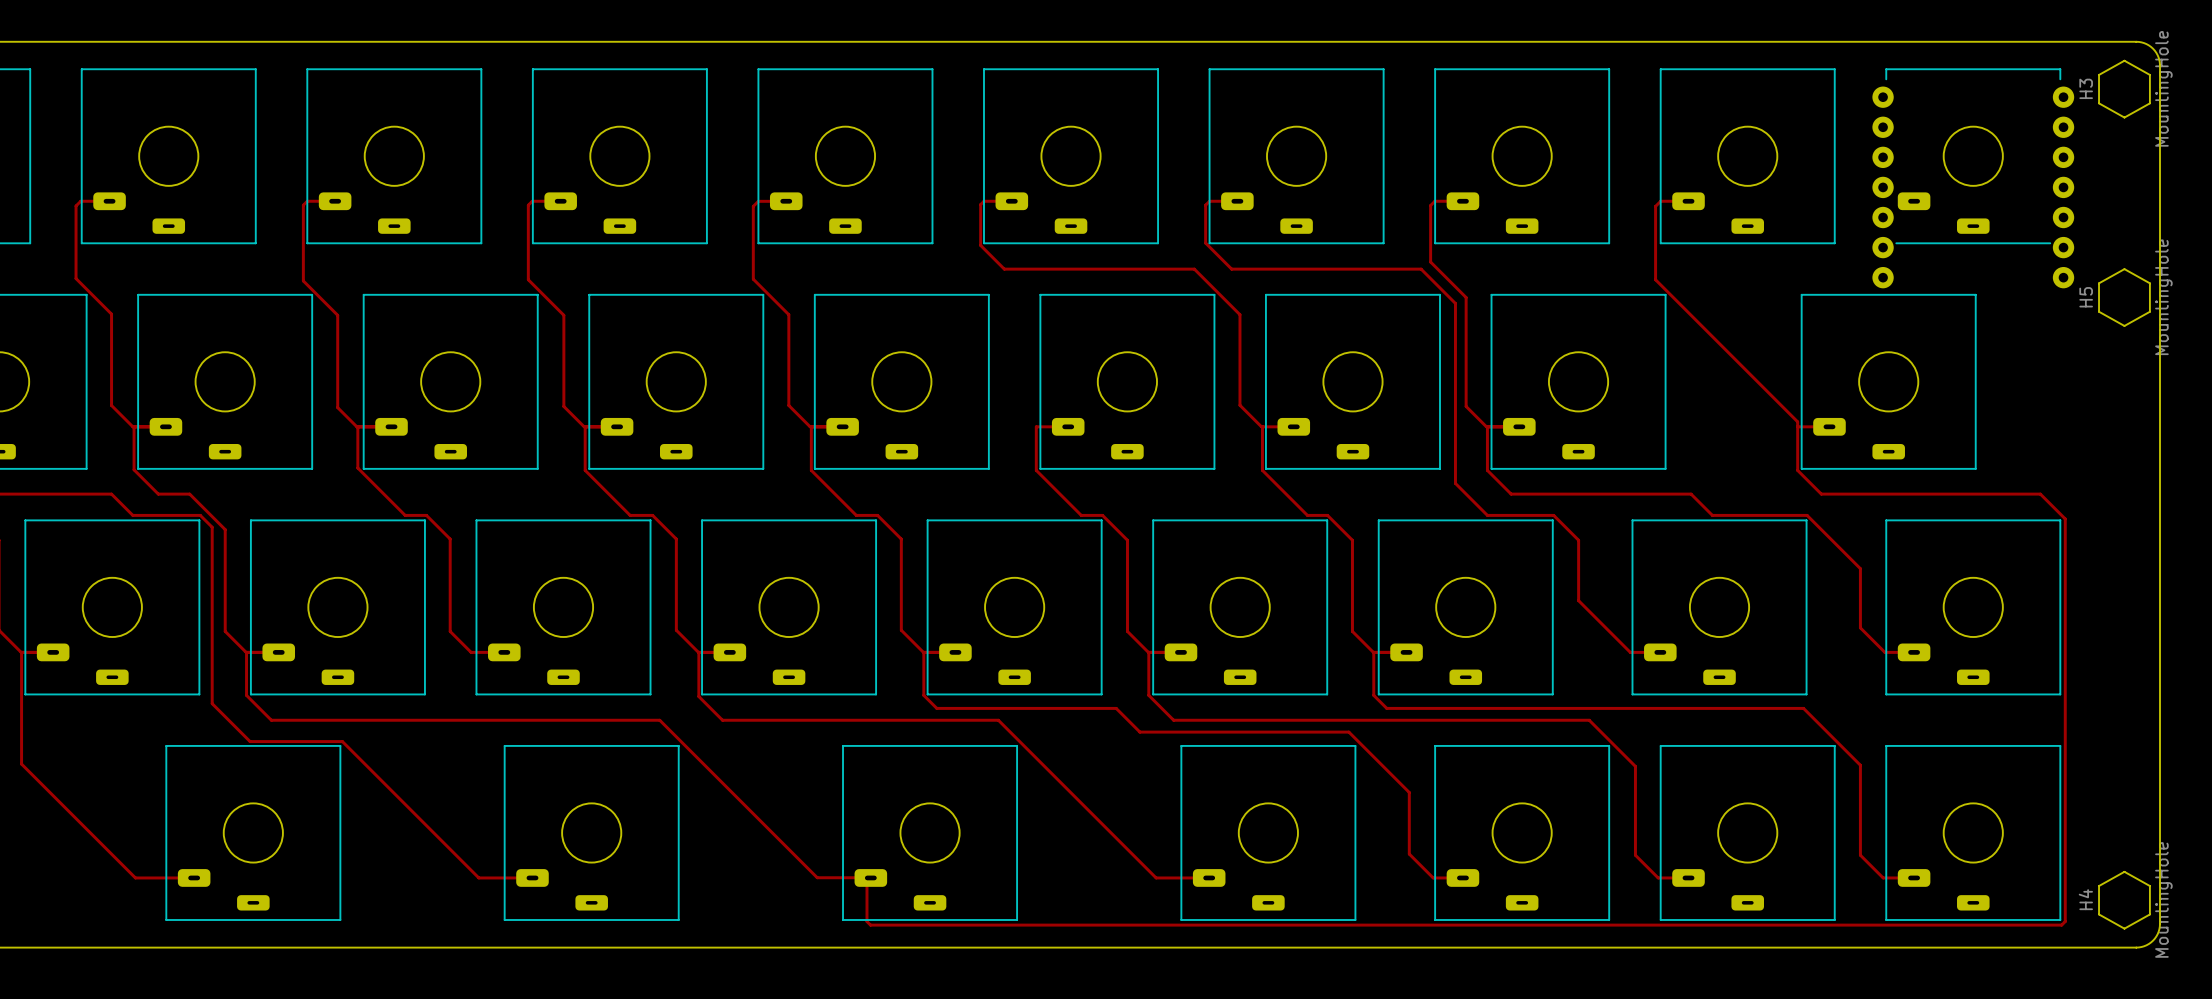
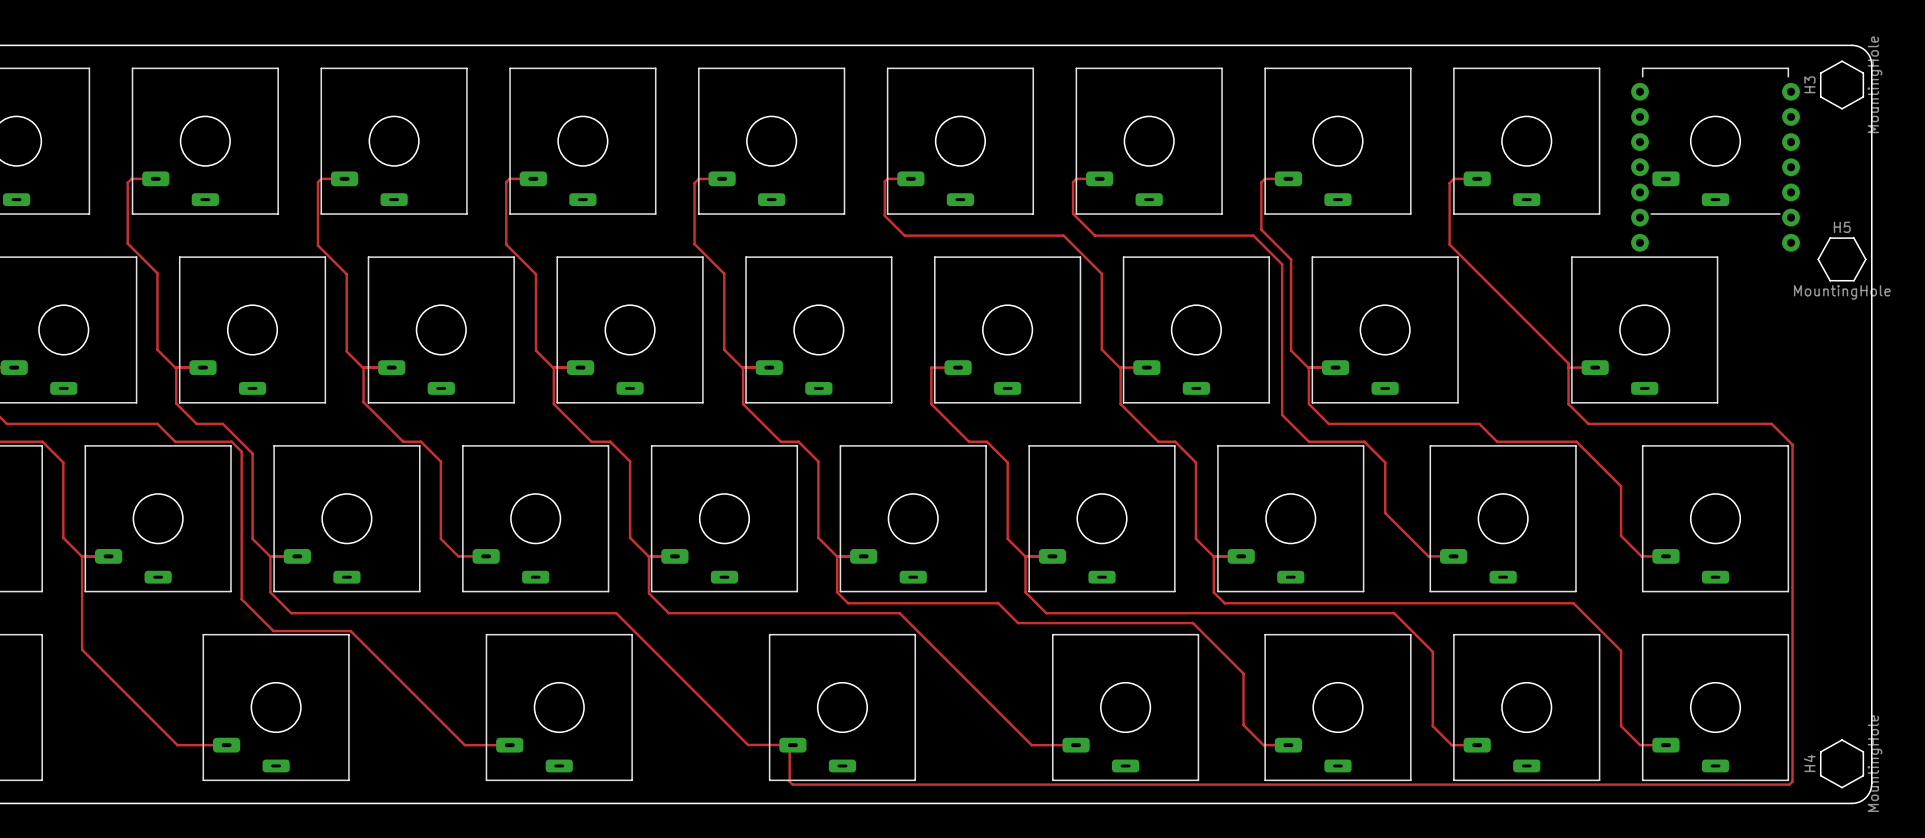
H5 rotation: 0° (2124, 297) -> 90° clockwise (1842, 259)

